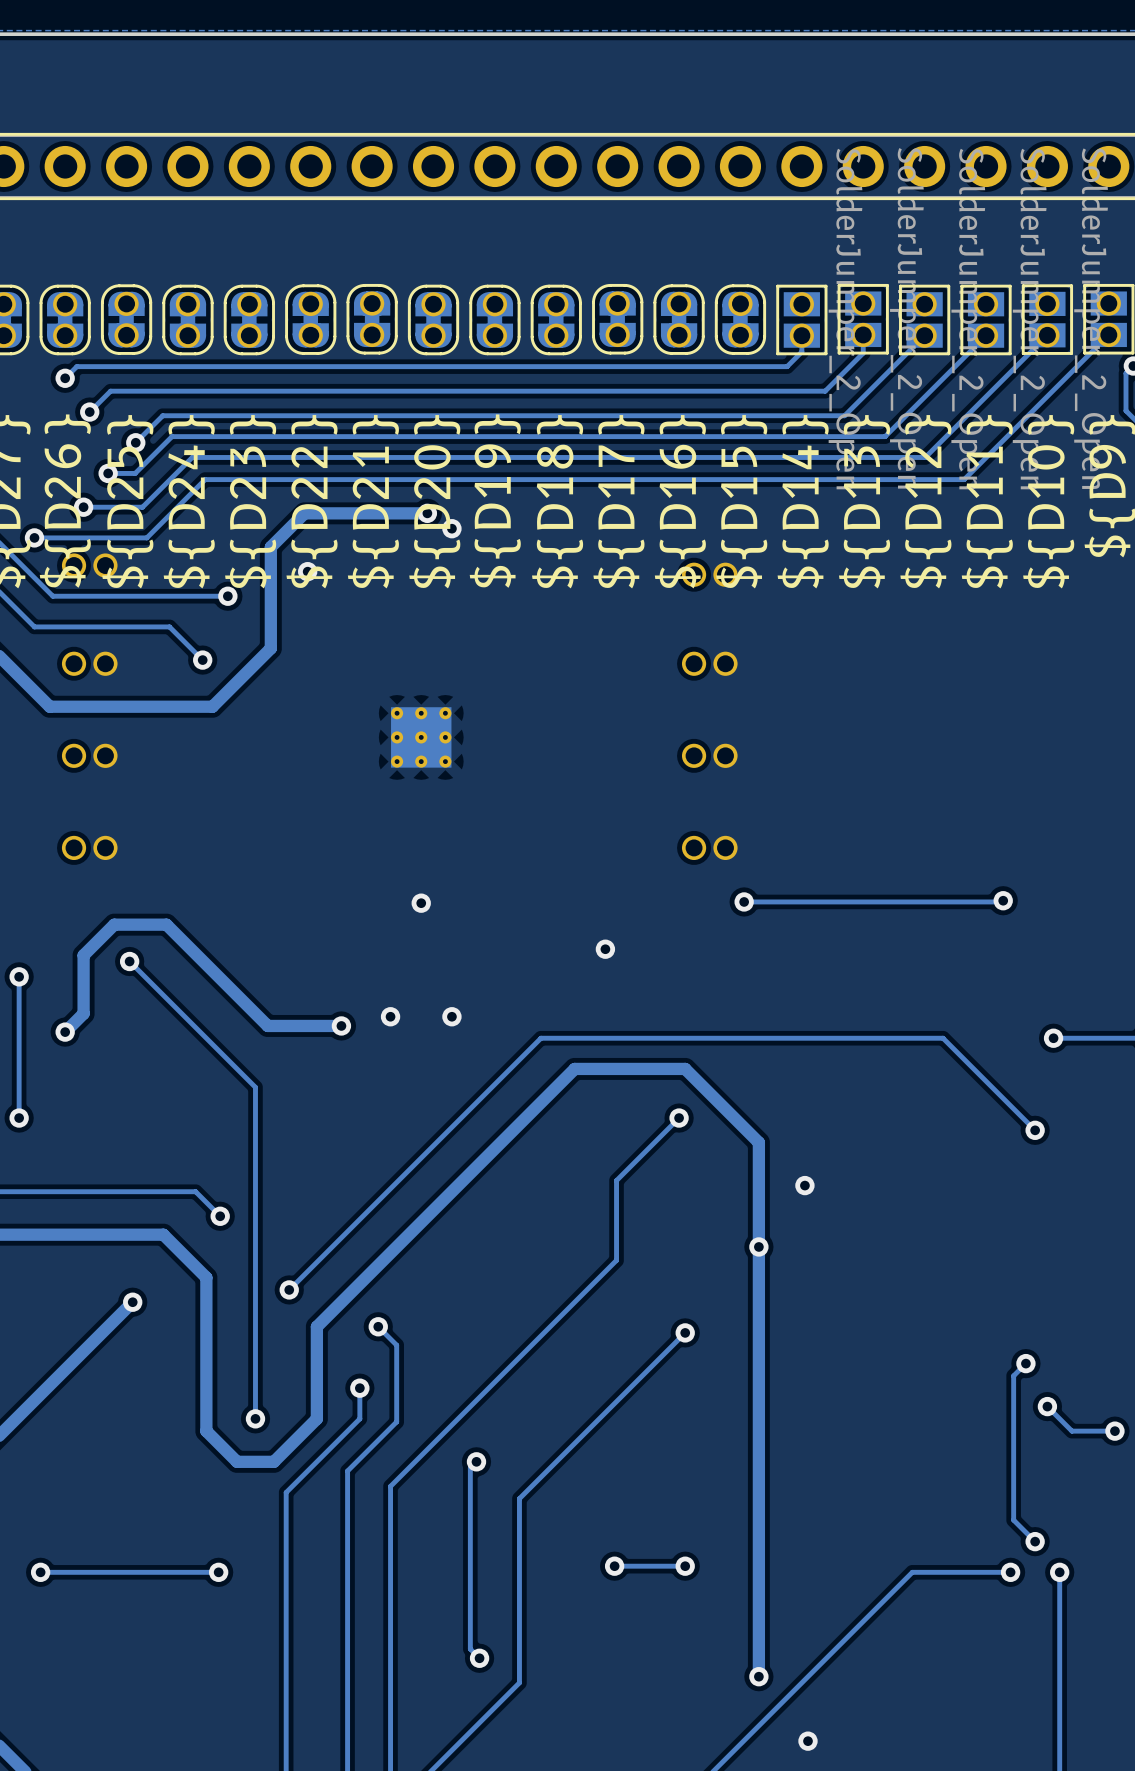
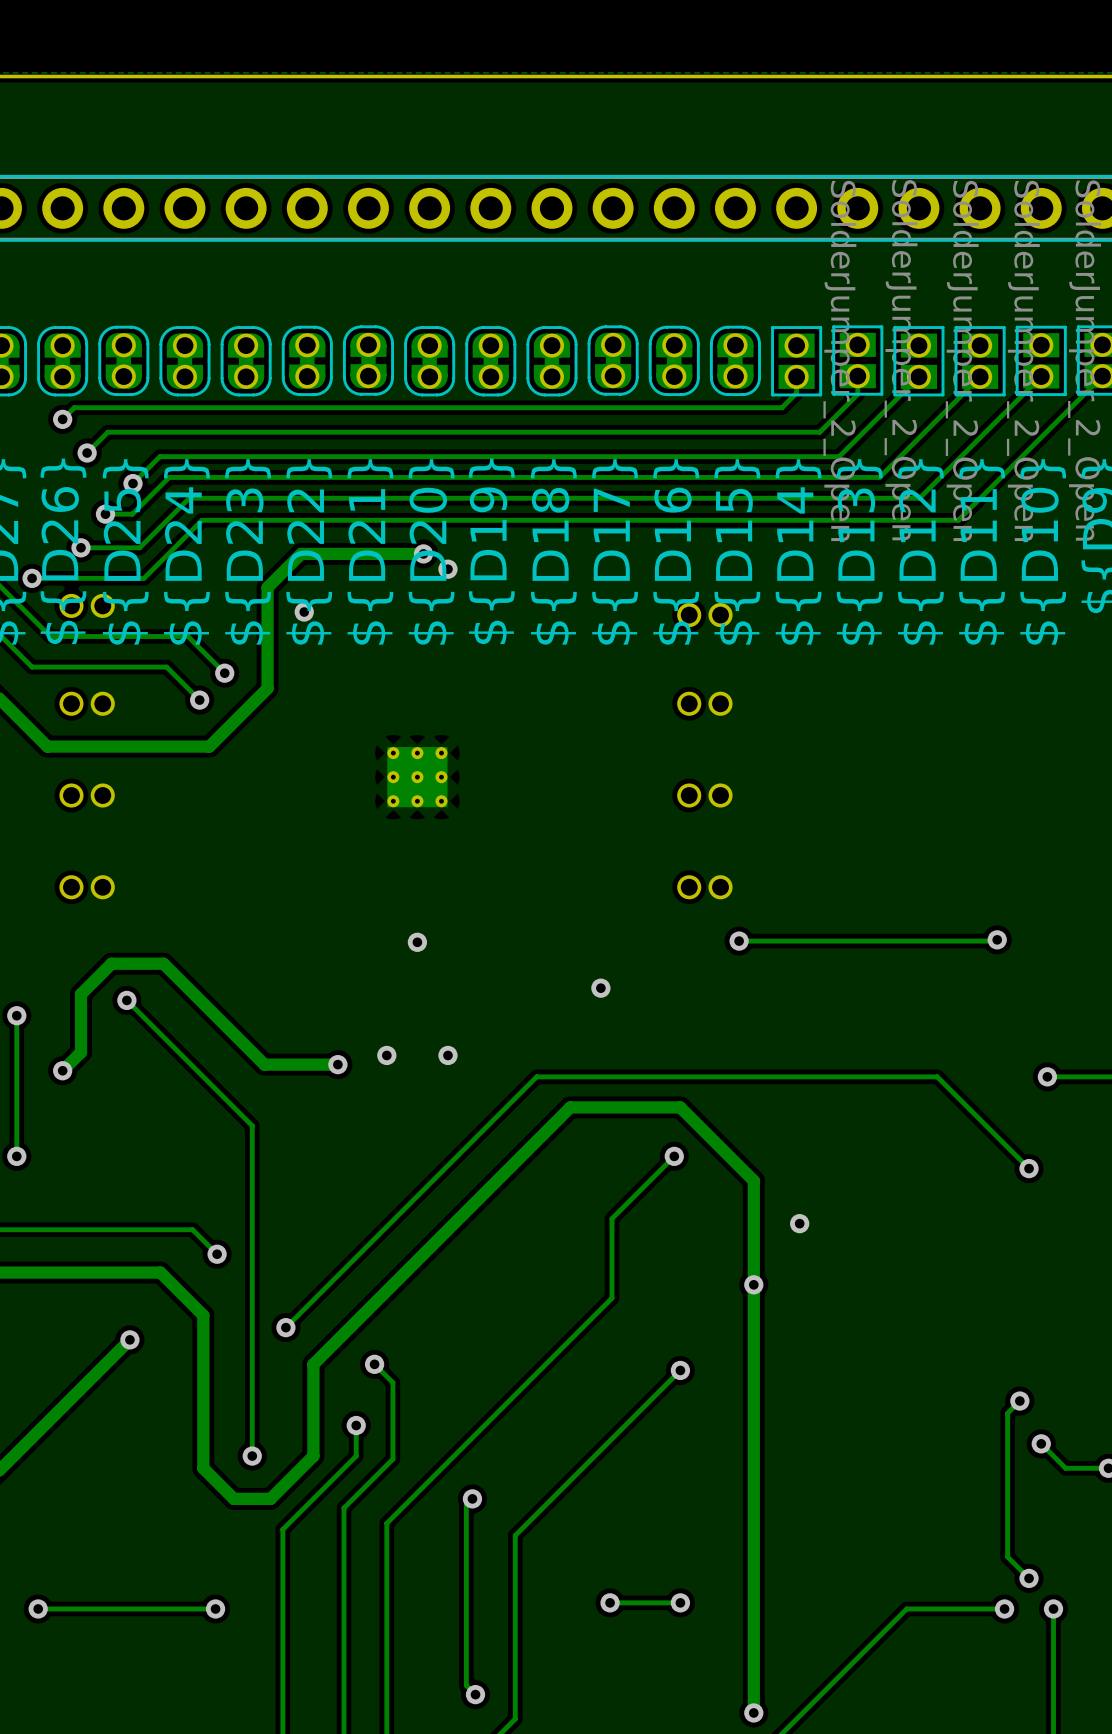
track: (227, 596) (191, 596) -> (224, 673) (188, 636)
via position: (227, 596) -> (224, 673)

